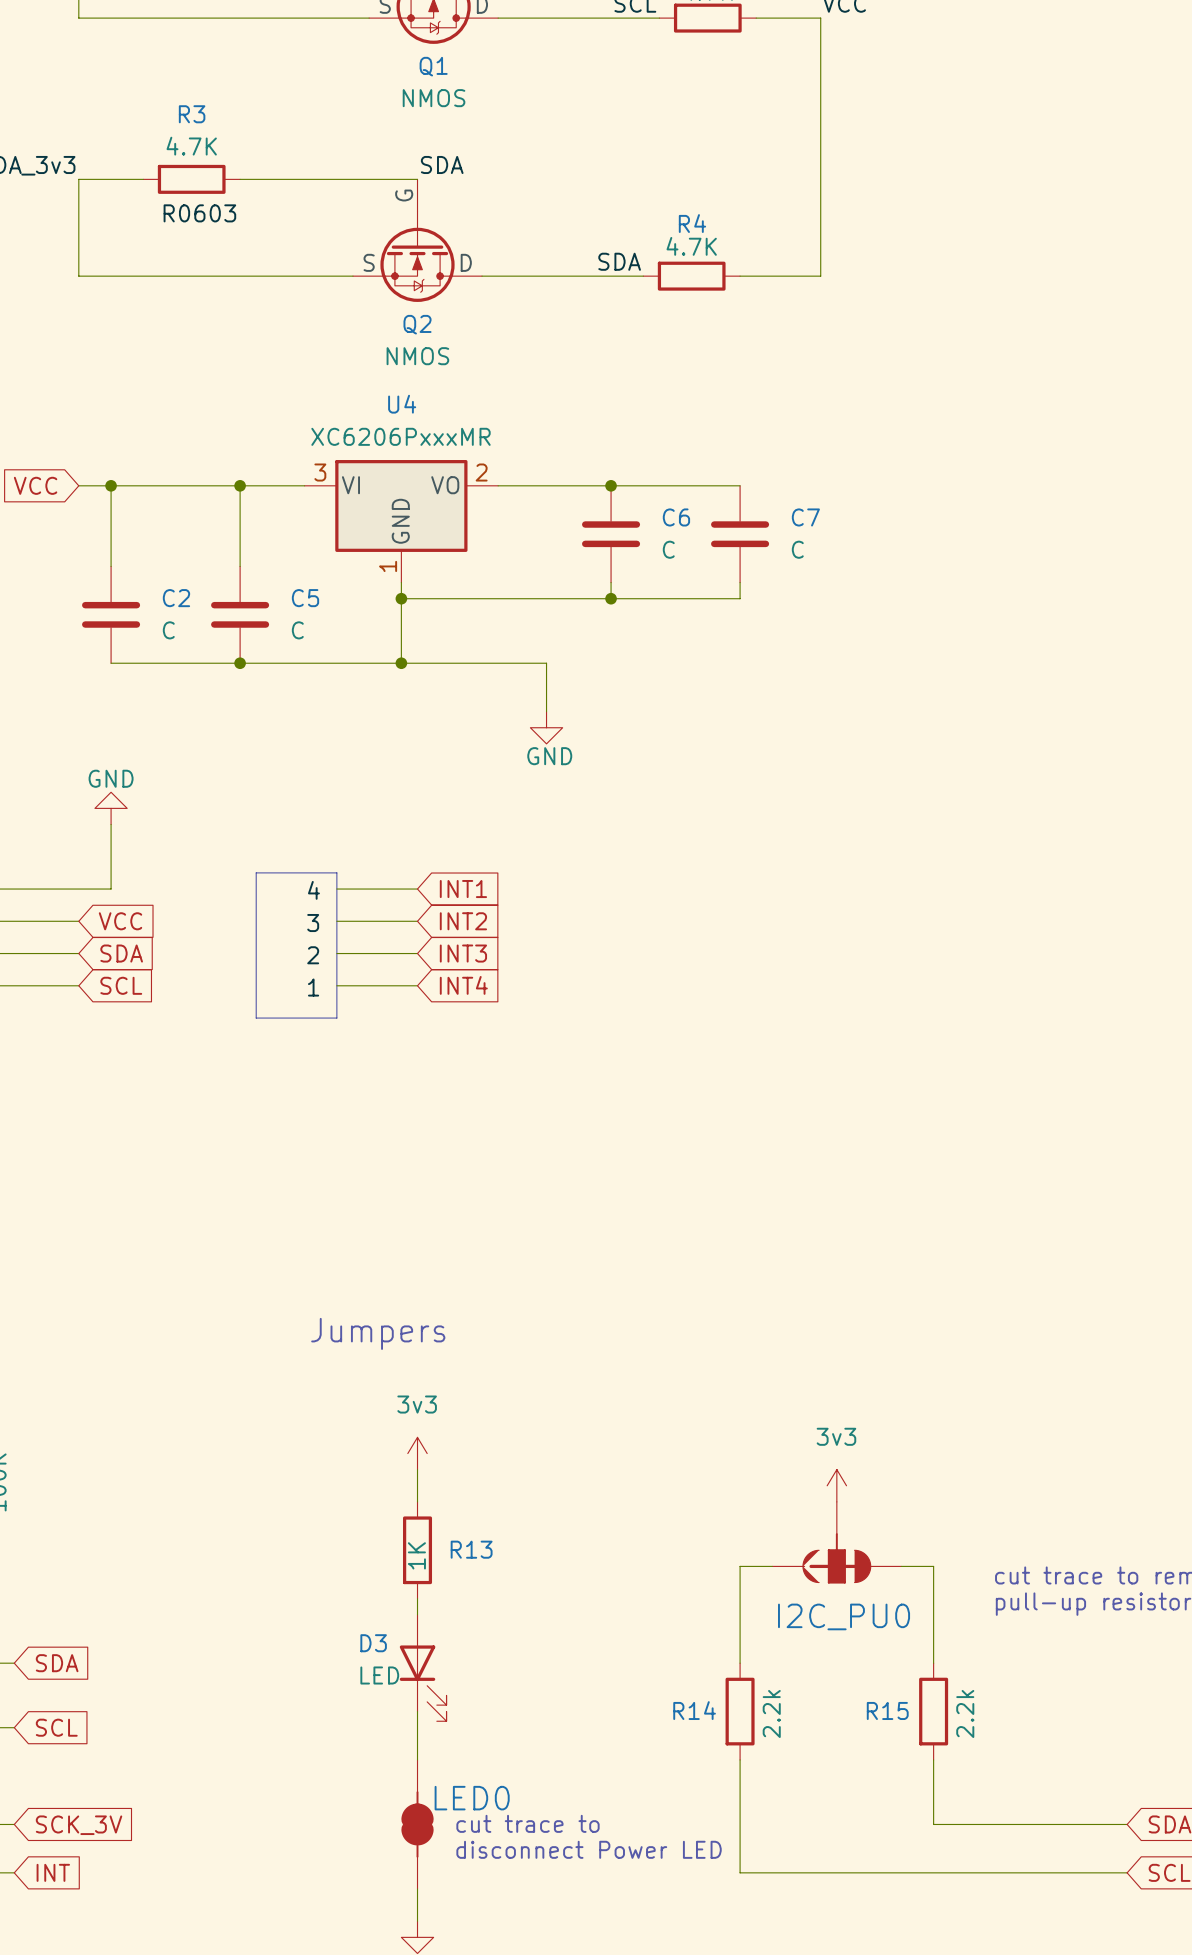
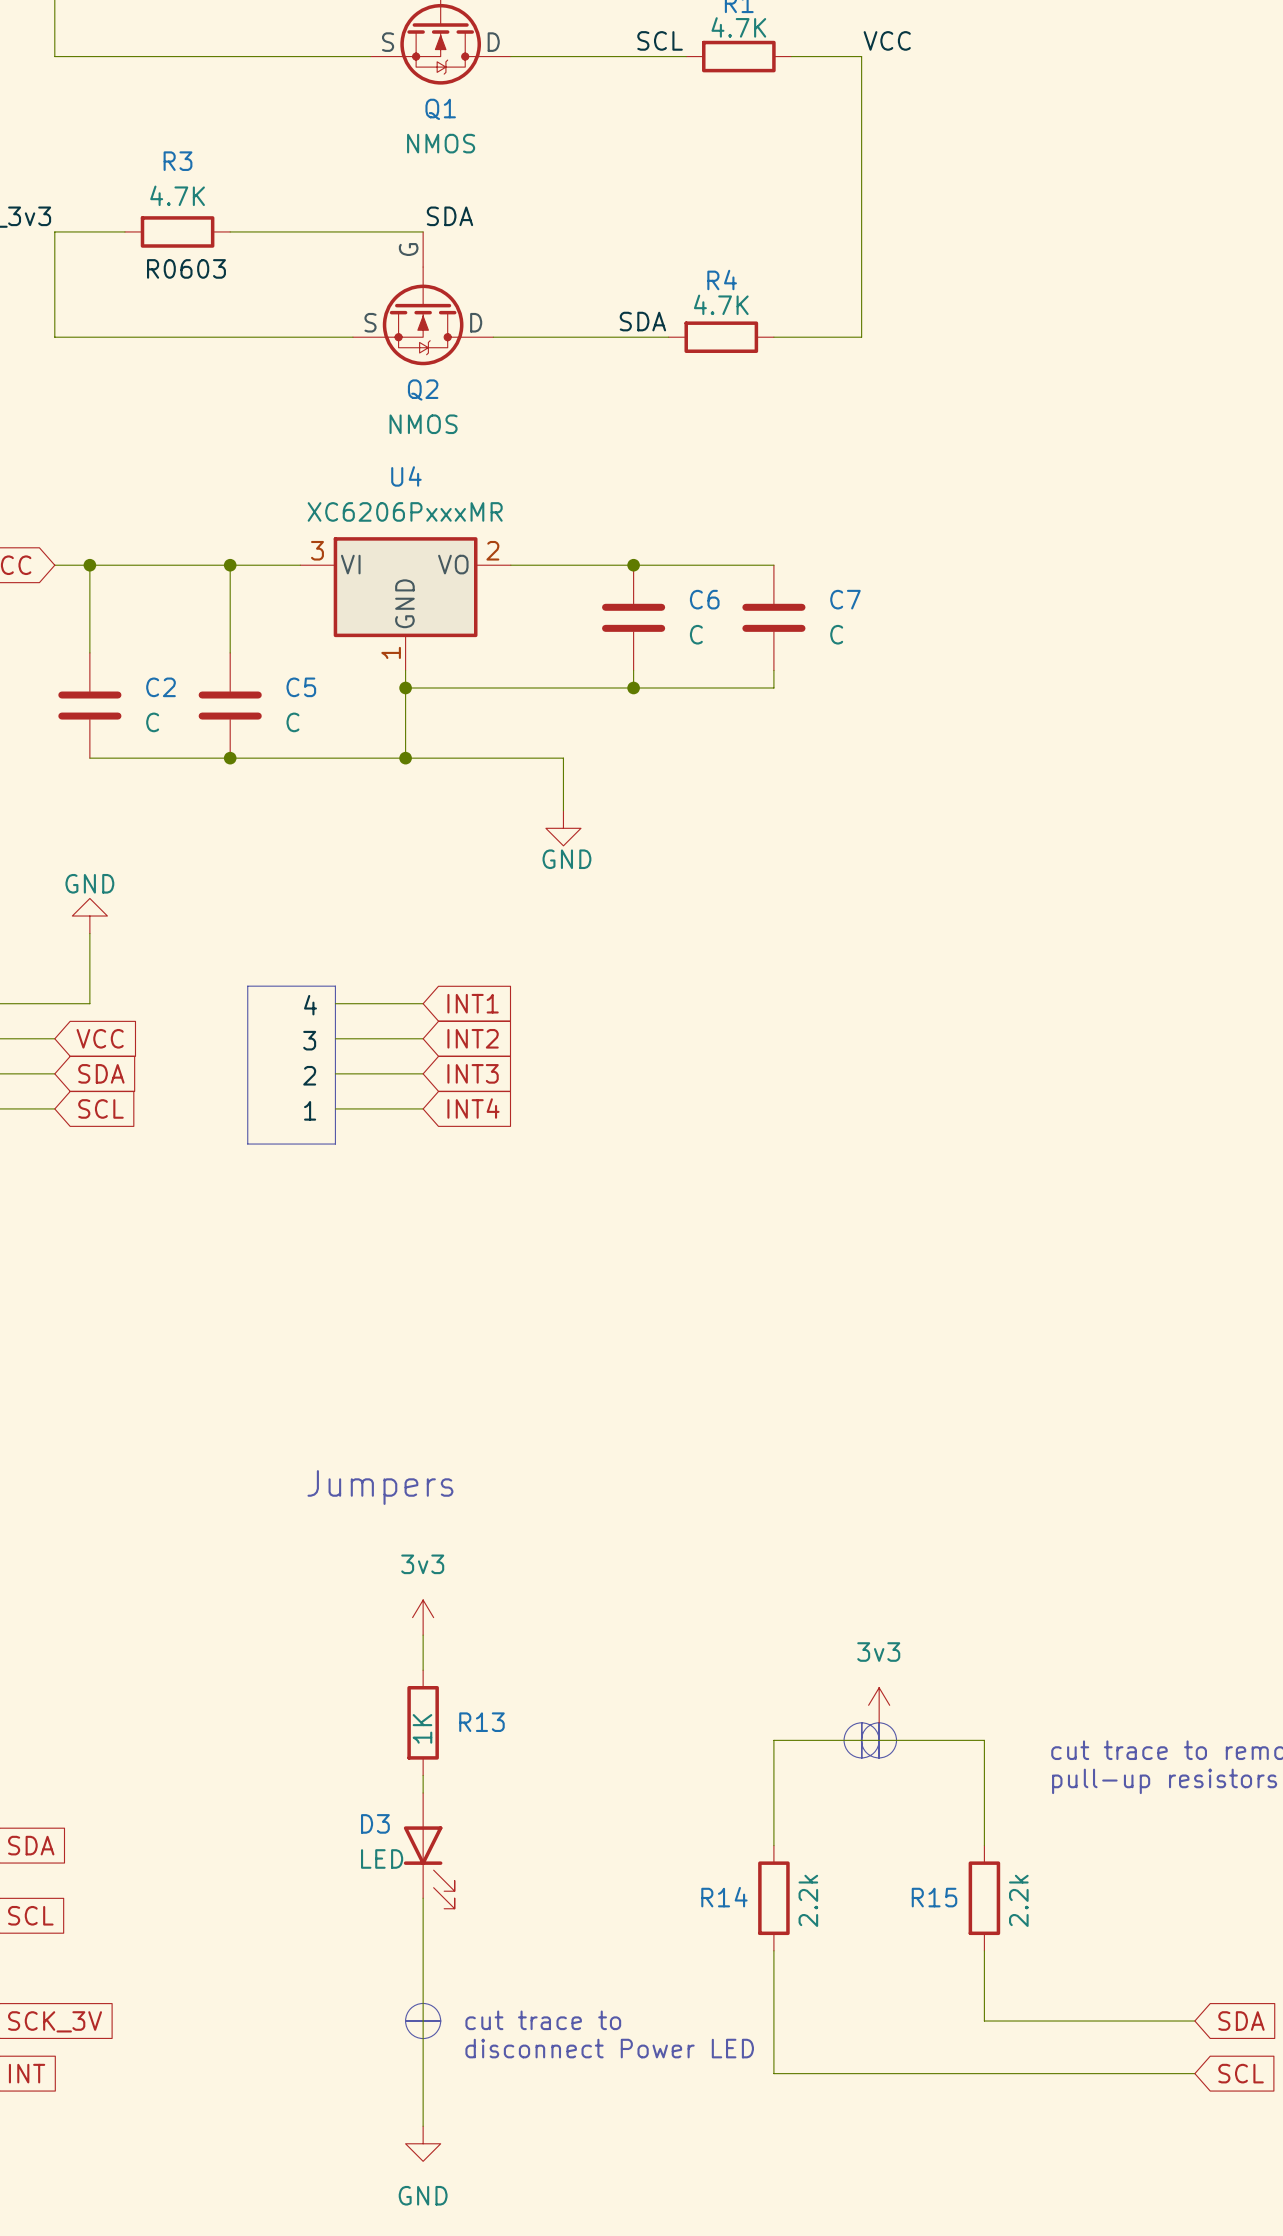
power symbol position: 3v3 (836, 1485) -> 3v3 (879, 1705)
I2C_PU0: (836, 1542) -> none
drawing: none -> [844, 1722, 897, 1758]
line: none -> (861, 1722) (861, 1722) (861, 1757) (861, 1757) (861, 1722)
line: none -> (878, 1722) (879, 1722) (879, 1757) (878, 1757) (878, 1722)
drawing: none -> [405, 2003, 441, 2039]
line: none -> (405, 2020) (440, 2020) (440, 2021) (405, 2021) (405, 2020)
LED0: (417, 1824) -> none

